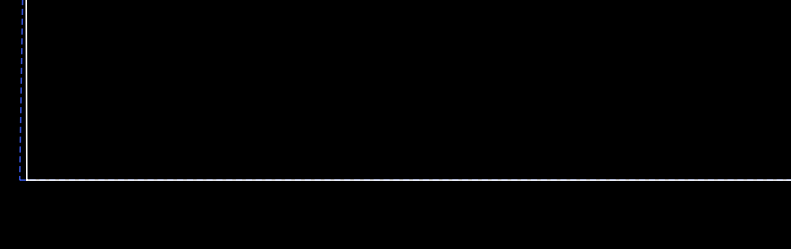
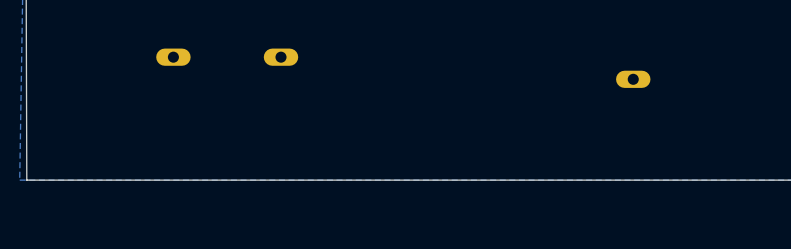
part: none -> (173, 57)
part: none -> (281, 57)
part: none -> (633, 79)

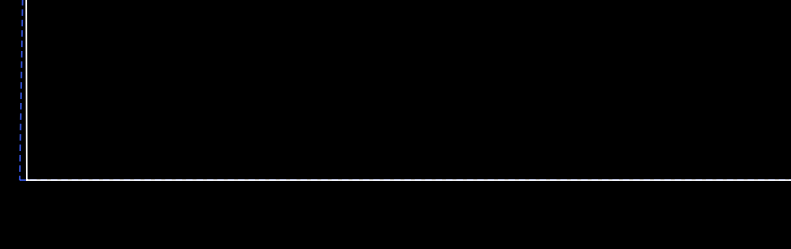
part: (173, 57) -> none
part: (281, 57) -> none
part: (633, 79) -> none

